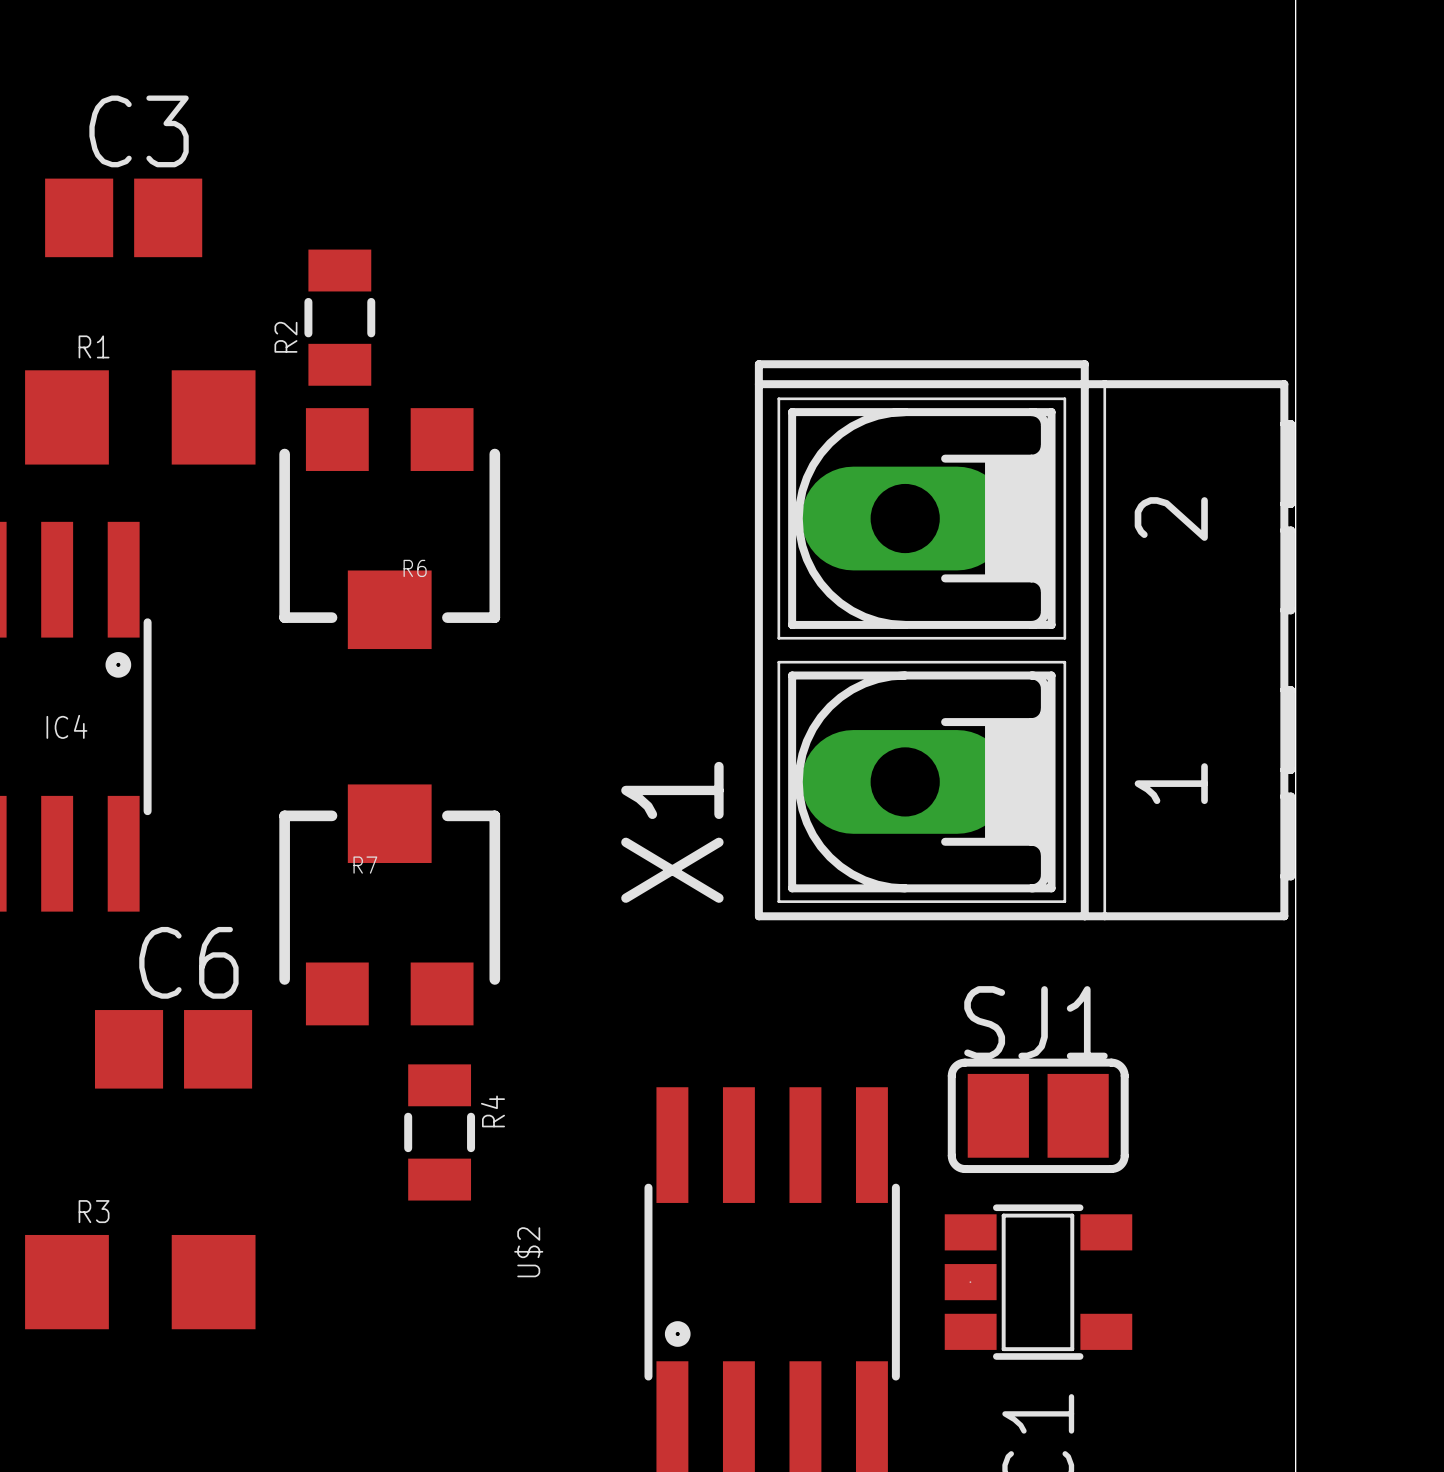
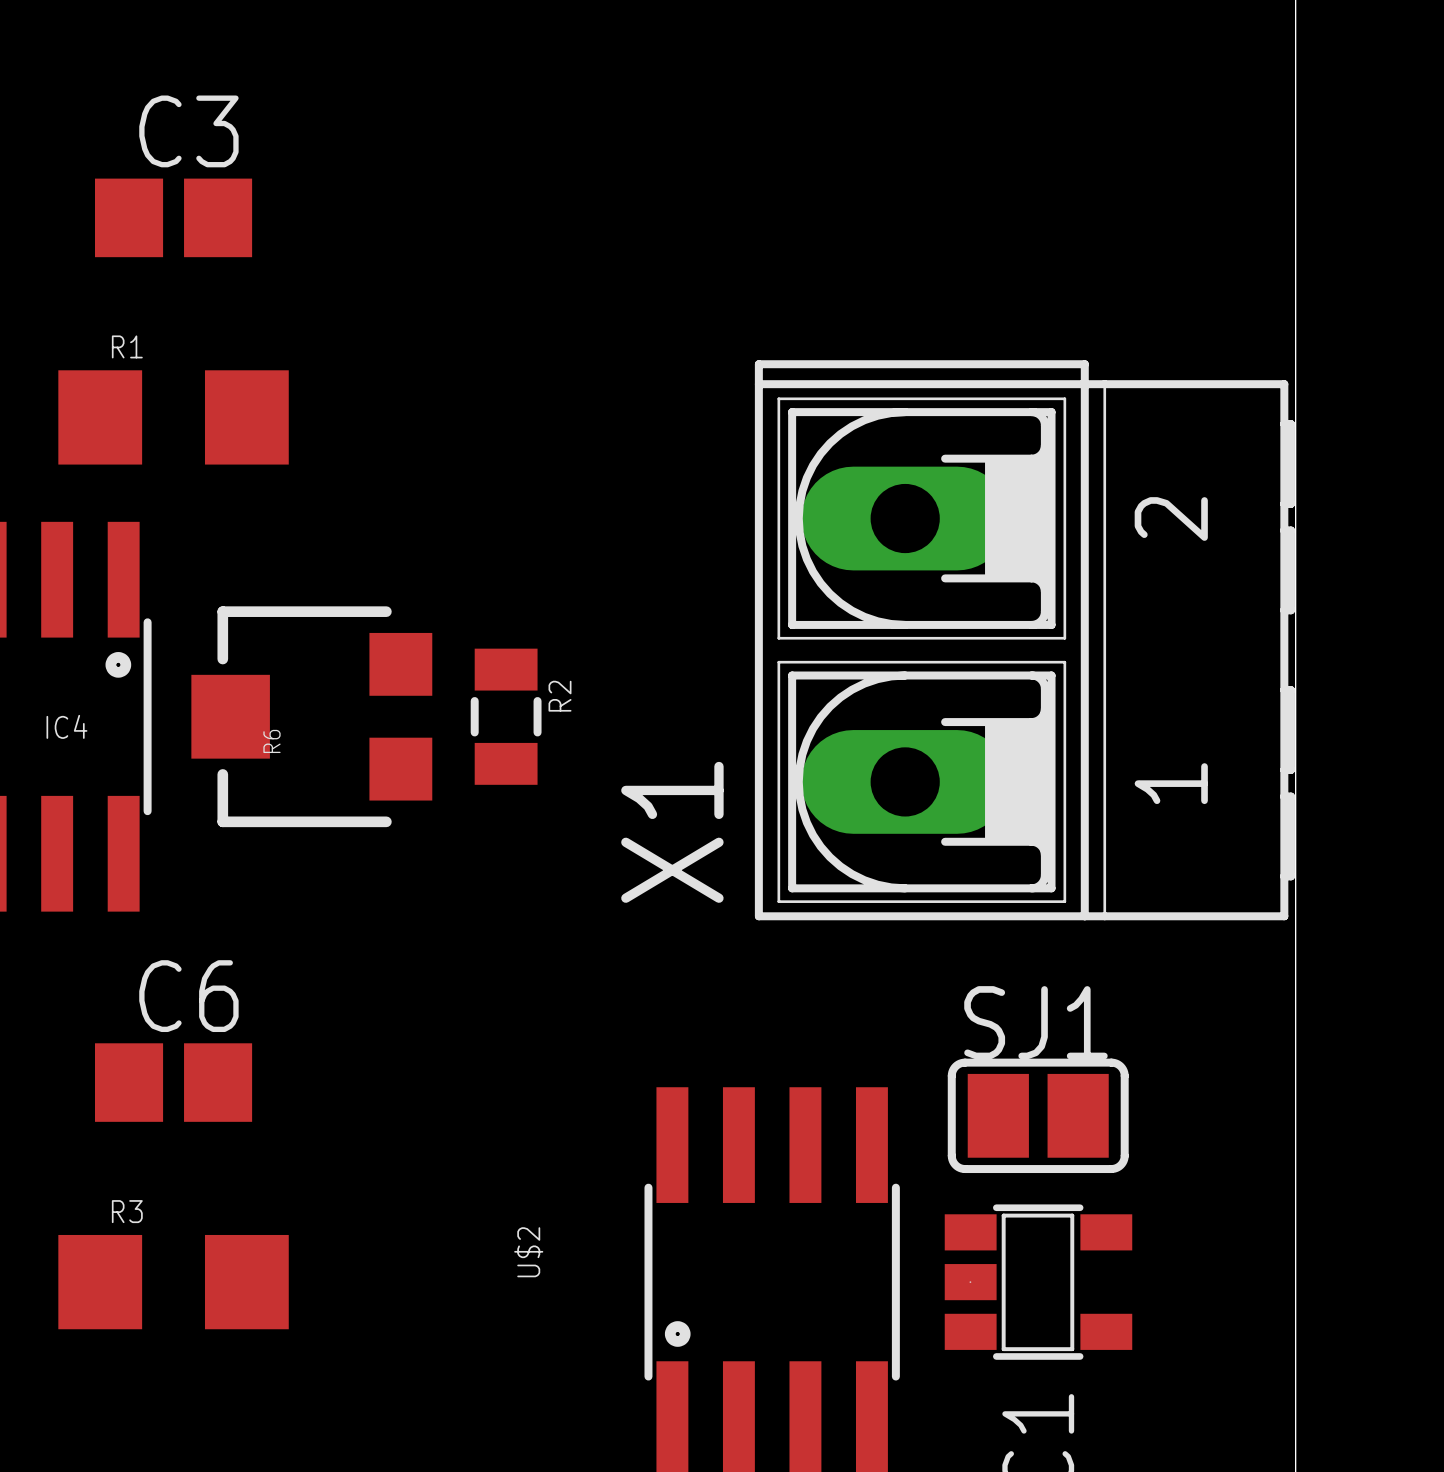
C3 position: (123, 217) -> (173, 217)
R2 position: (339, 317) -> (506, 716)
R2 name position: R2 (285, 337) -> R2 (560, 696)
R1 position: (140, 417) -> (173, 417)
R6 rotation: 0° (389, 528) -> 90° clockwise (311, 716)
R6 position: (389, 528) -> (311, 716)
R7: (389, 904) -> none
C6 position: (173, 1049) -> (173, 1082)
R4: (439, 1132) -> none
R3 position: (140, 1282) -> (173, 1282)

